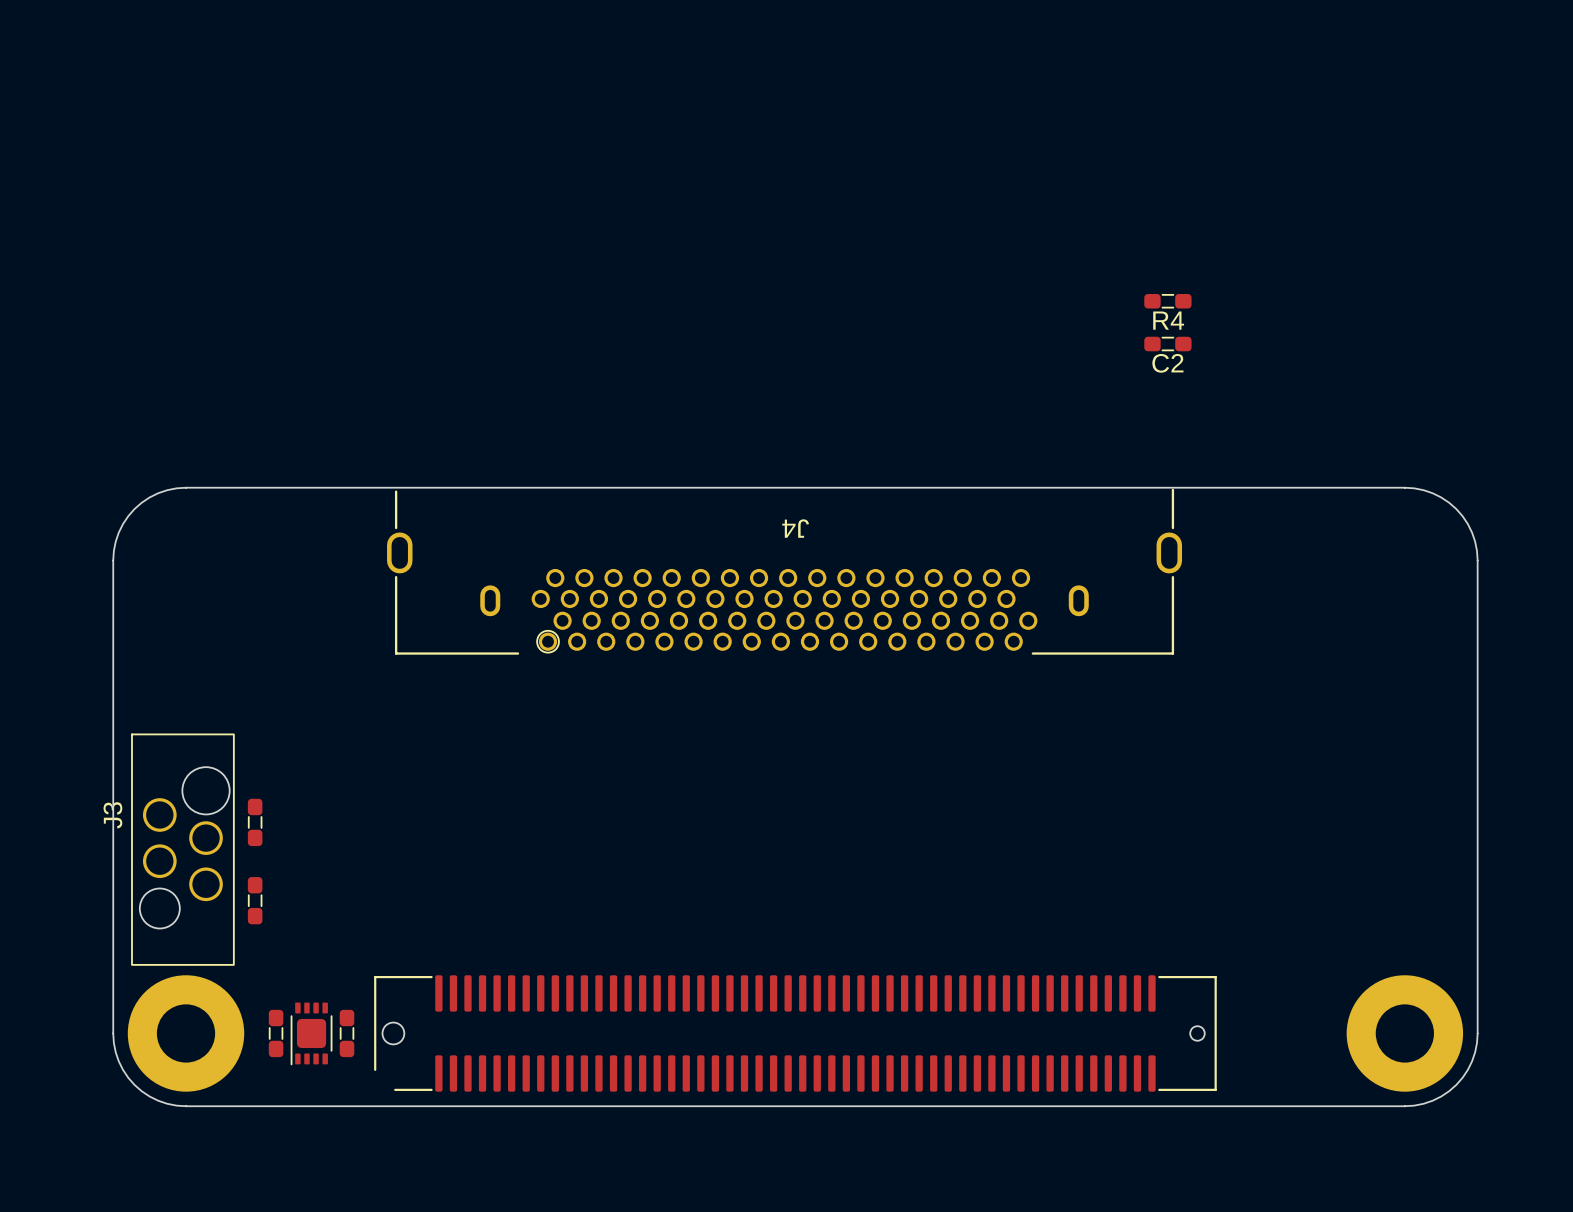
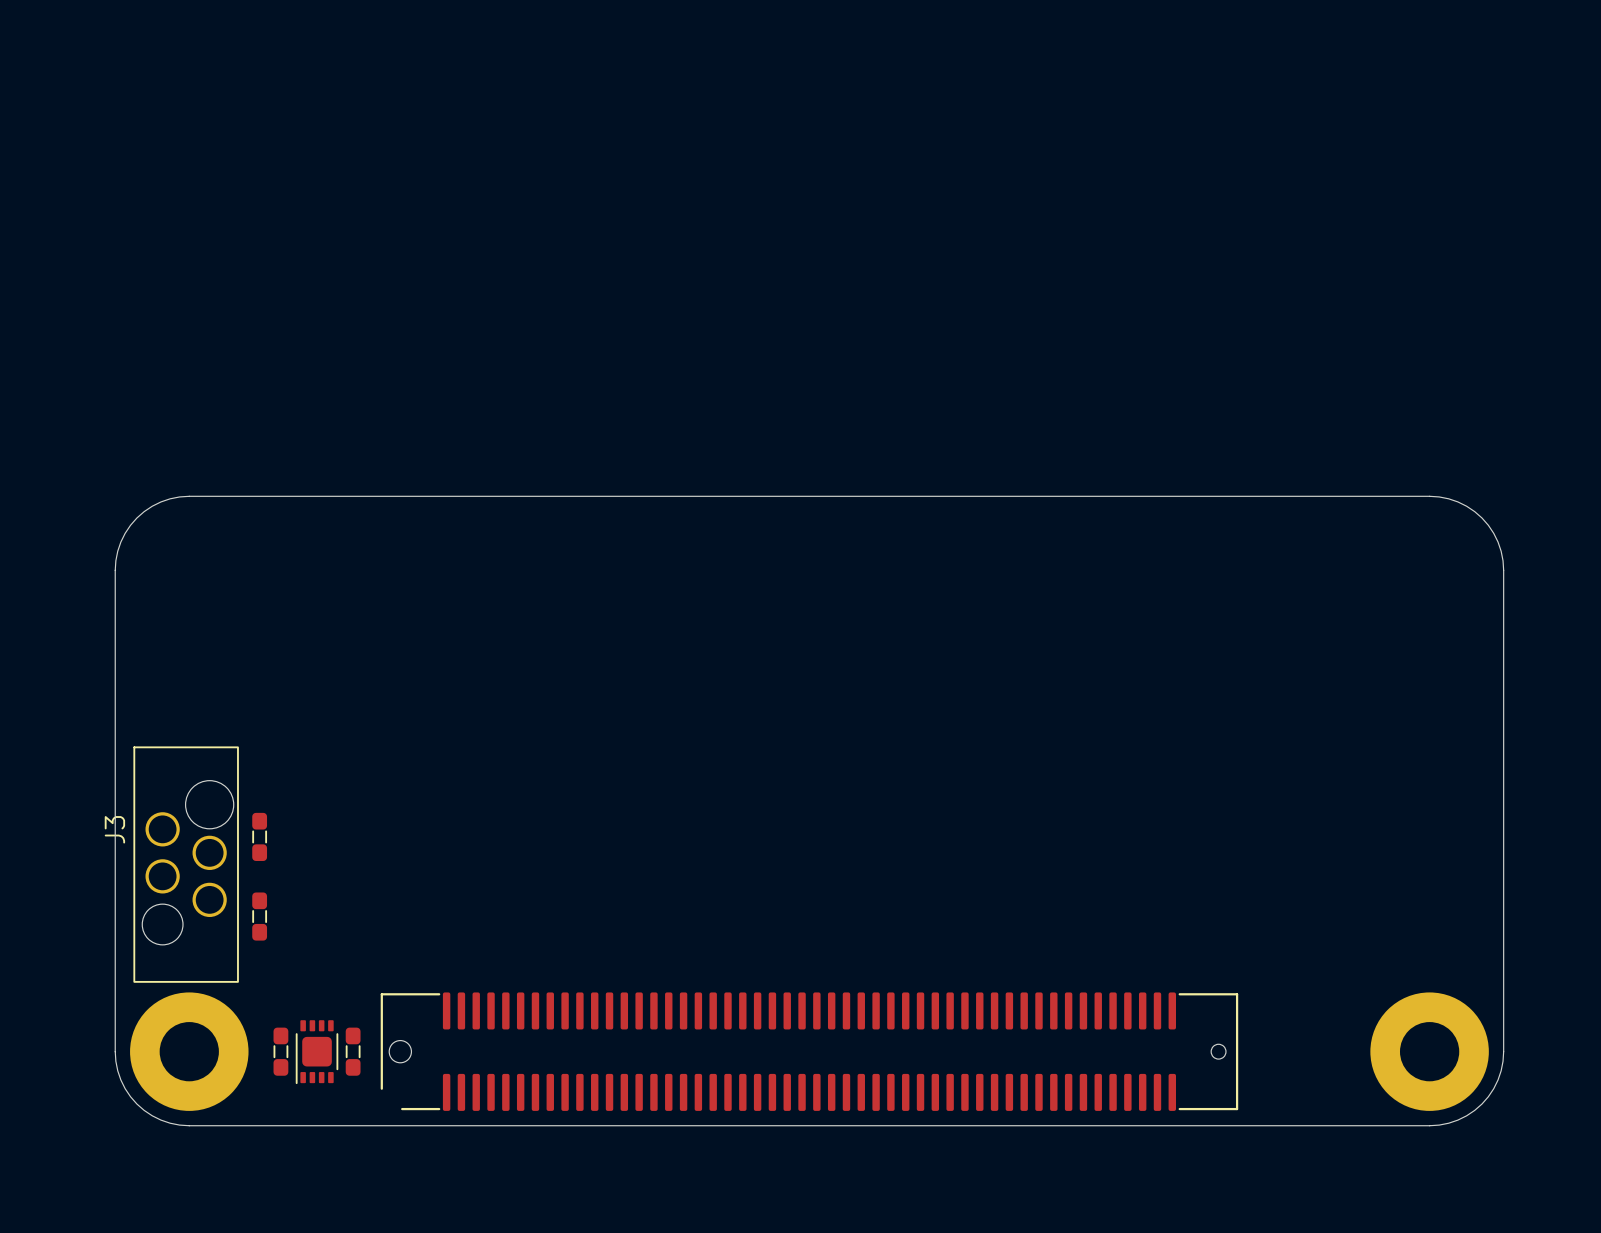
R4: (1167, 301) -> none
C2: (1167, 344) -> none
J4: (784, 571) -> none

